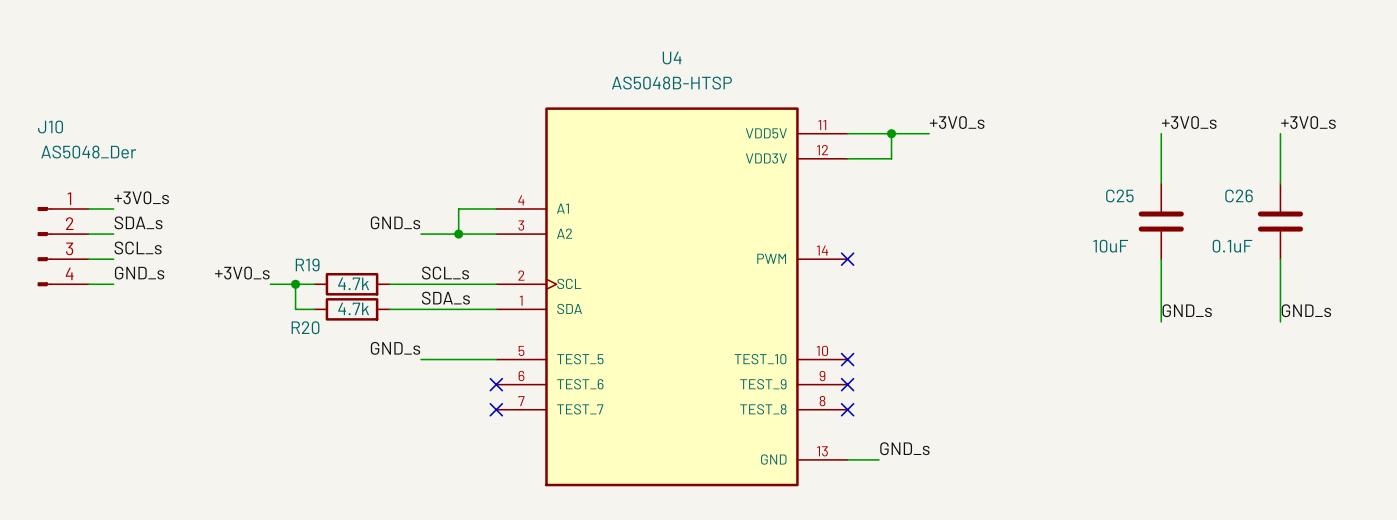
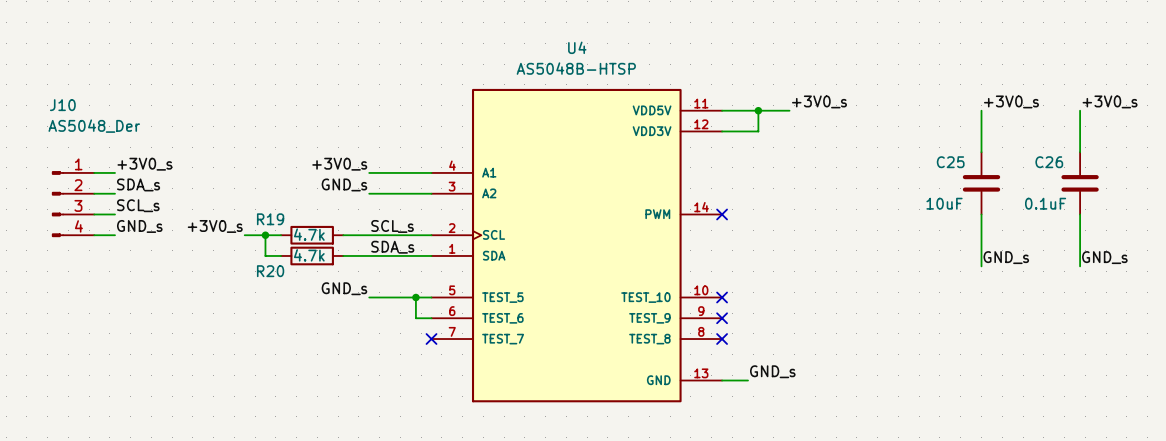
label: none -> +3V0_s (339, 164)
wire: (458, 208) (458, 234) -> (400, 172) (369, 172)
junction: (458, 234) -> none
wire: none -> (415, 297) (415, 318) (431, 318)
junction: none -> (415, 297)
no-connect mark: (496, 384) -> none

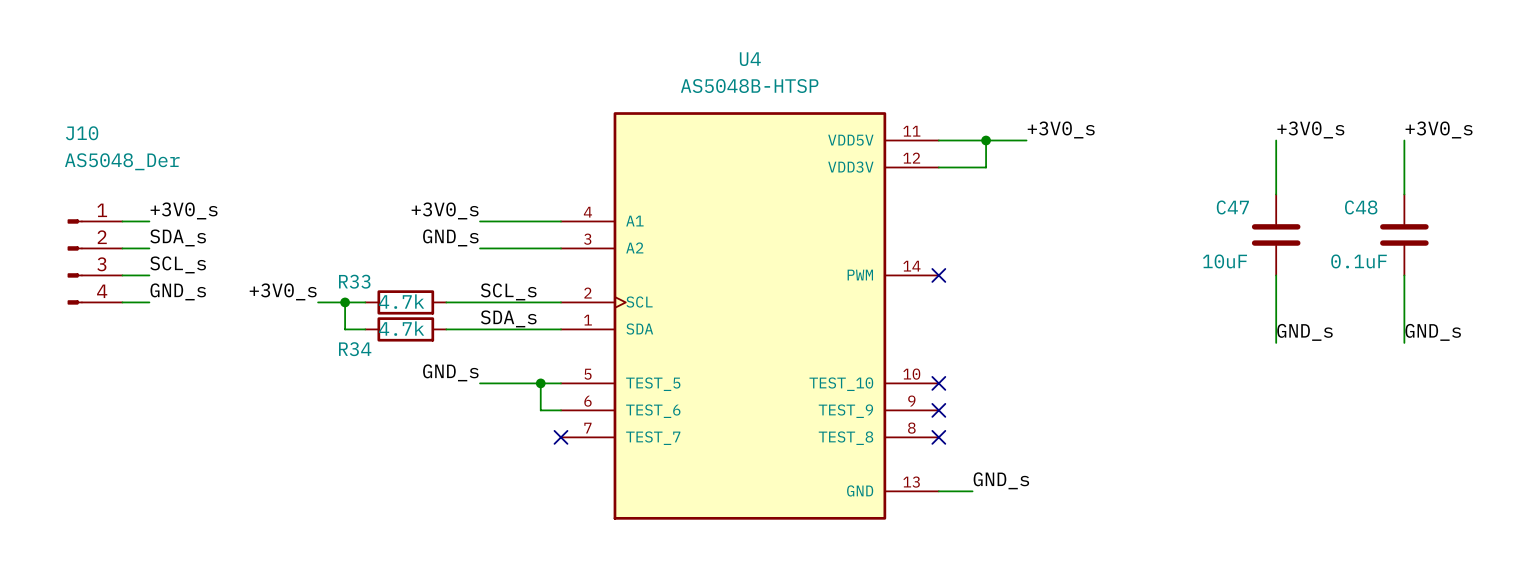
C25 name: C25 (950, 162) -> C47 (1232, 207)
C26 name: C26 (1049, 162) -> C48 (1361, 207)
R19 name: R19 (270, 219) -> R33 (354, 281)
R20 name: R20 (270, 271) -> R34 (355, 349)

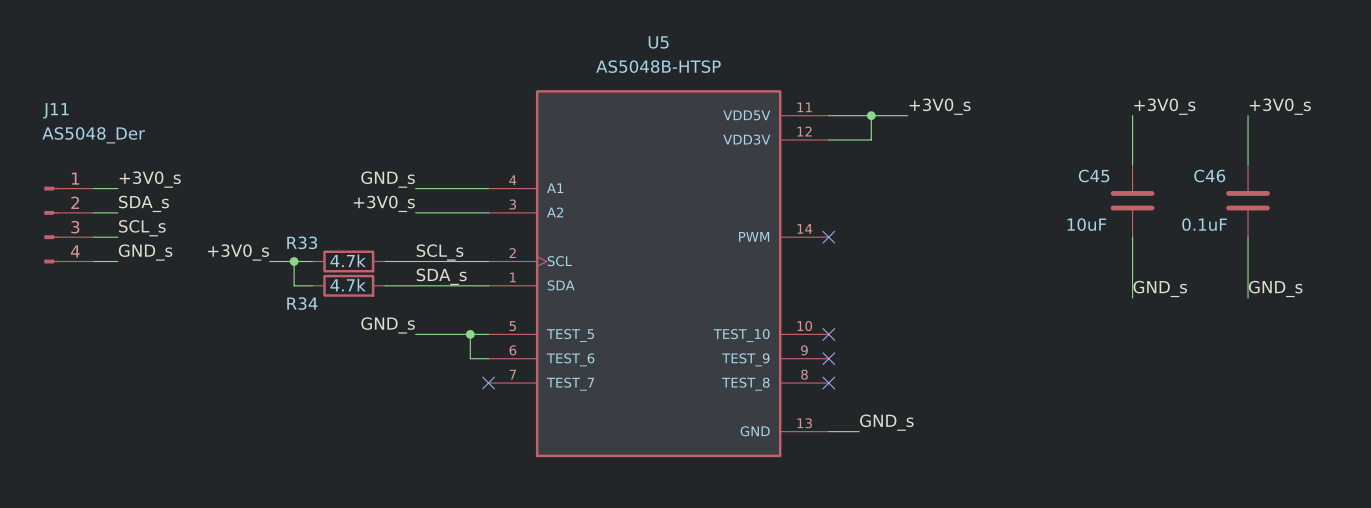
U4 name: U4 (750, 59) -> U5 (658, 42)
J10 name: J10 (82, 133) -> J11 (55, 110)
C47 name: C47 (1232, 207) -> C45 (1094, 175)
C48 name: C48 (1361, 207) -> C46 (1209, 175)
label: +3V0_s (445, 210) -> GND_s (388, 179)
label: GND_s (450, 237) -> +3V0_s (384, 203)

